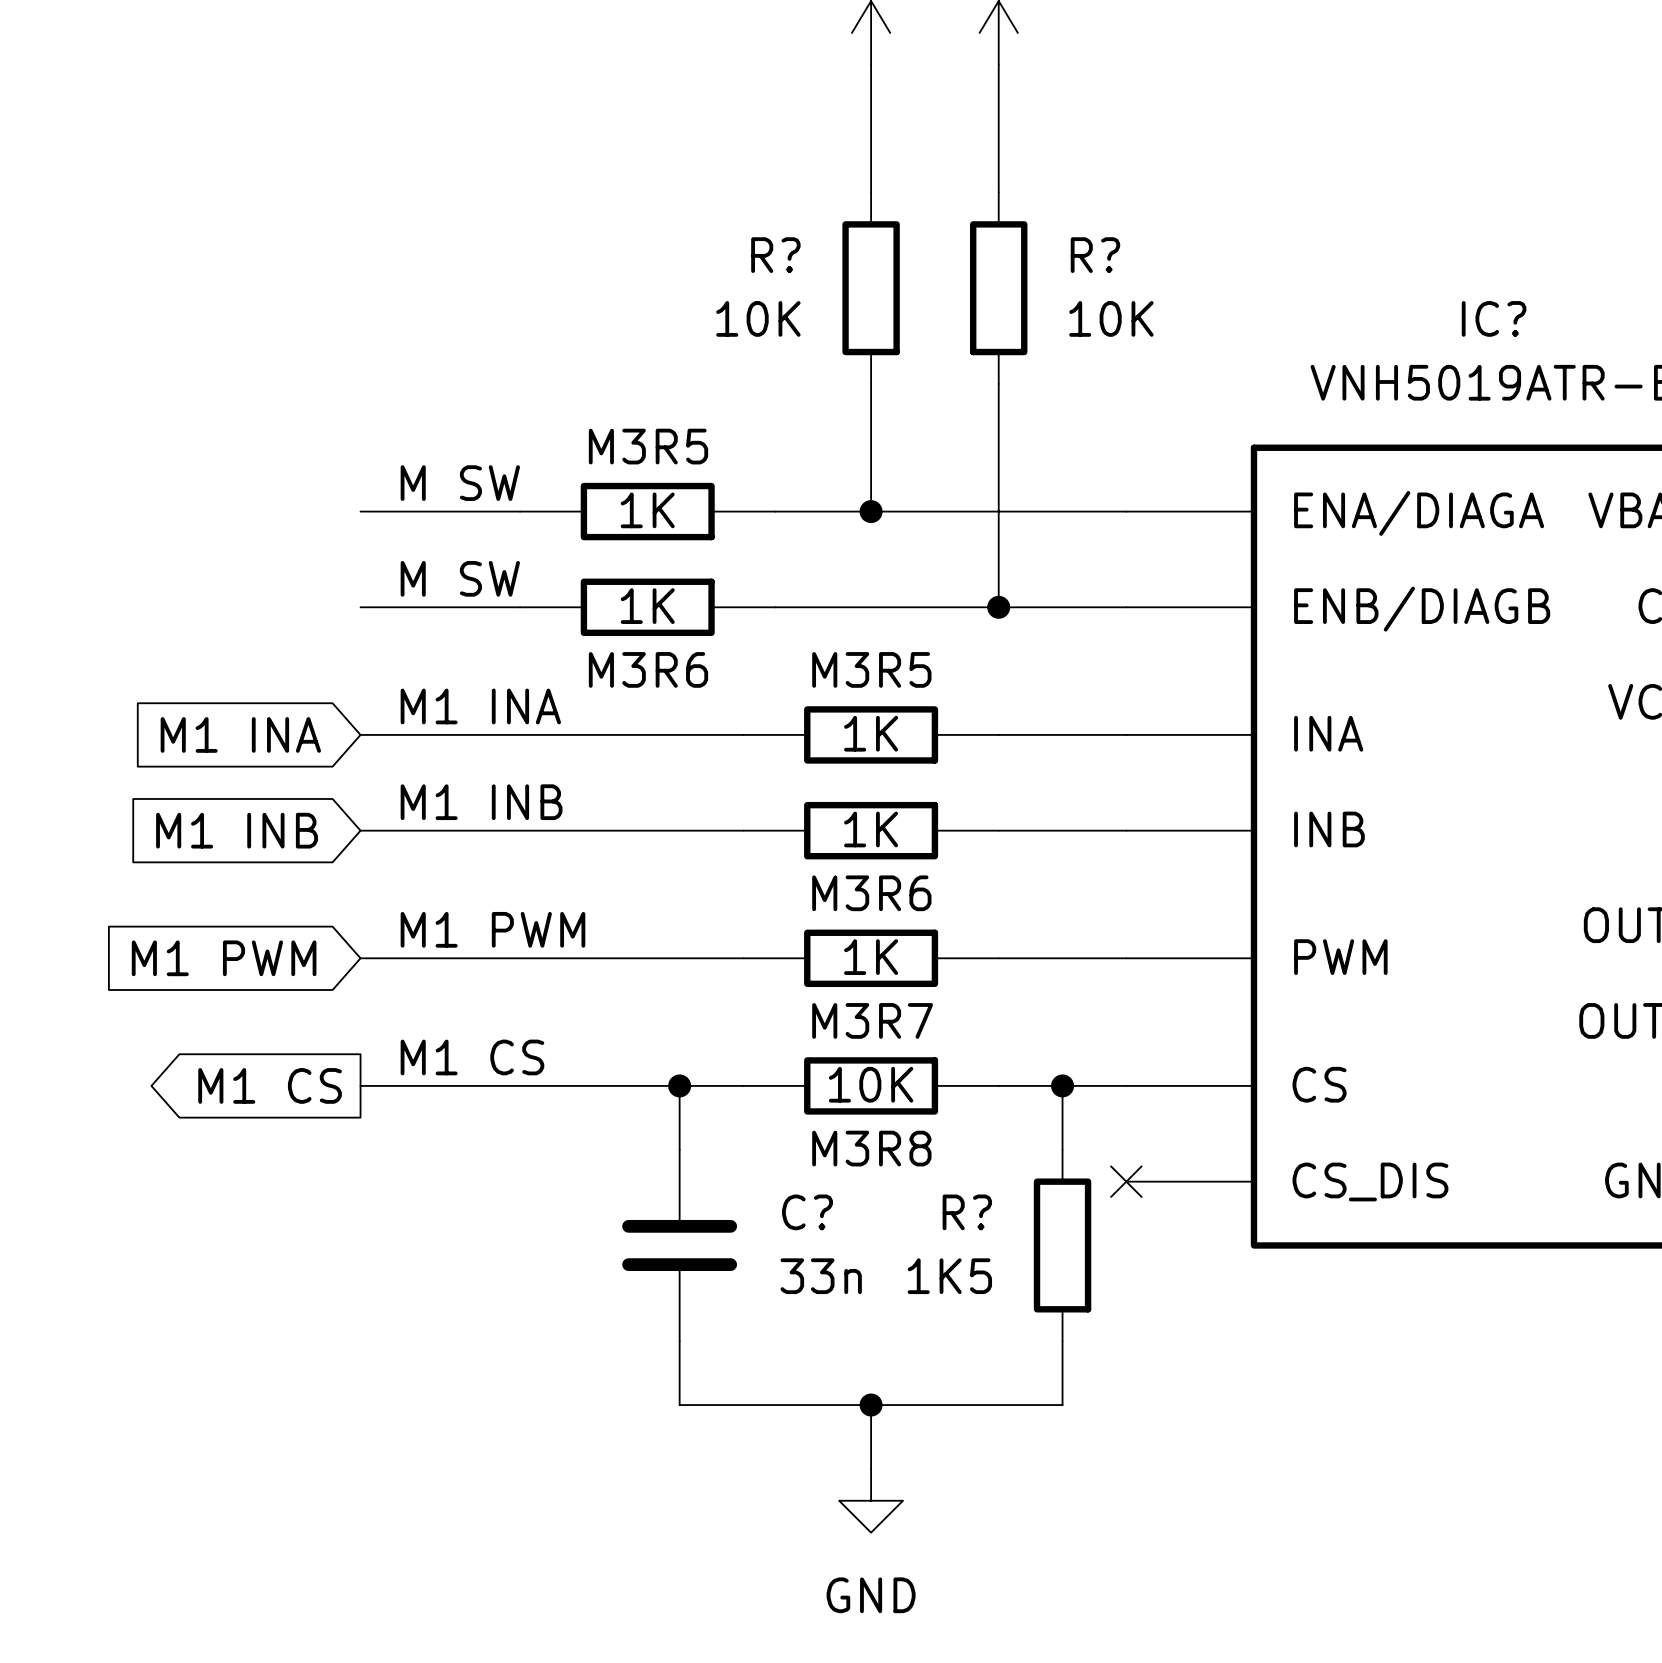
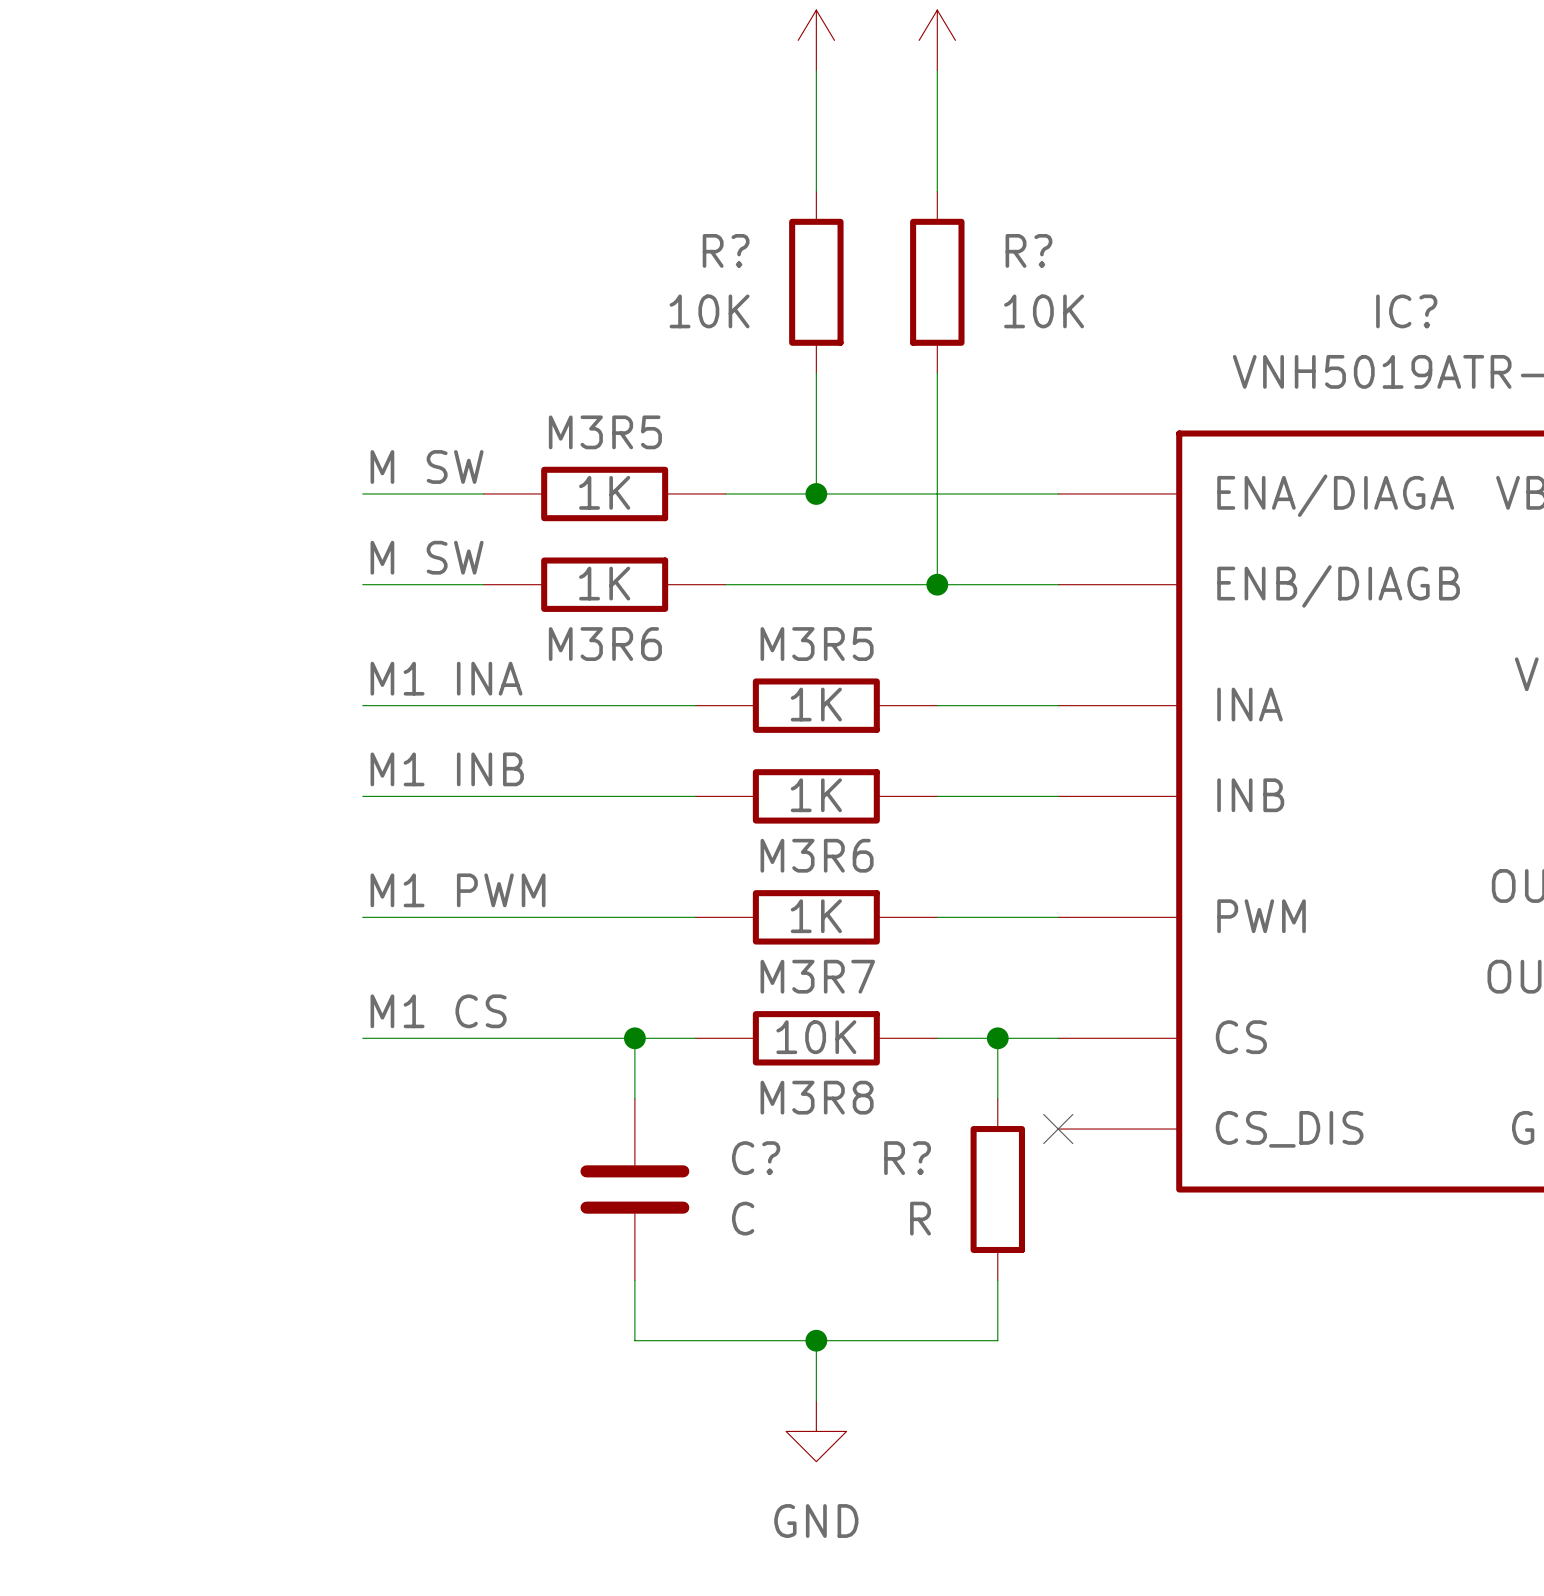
wire: (360, 511) (392, 511) -> none
wire: (360, 607) (392, 607) -> none
global label: M1 INA (240, 734) -> none
wire: (360, 734) (392, 734) -> none
global label: M1 INB (237, 830) -> none
wire: (360, 830) (392, 830) -> none
global label: M1 PWM (224, 958) -> none
wire: (360, 958) (392, 958) -> none
global label: M1 CS (270, 1085) -> none
wire: (360, 1085) (392, 1085) -> none
C? value: 33n (821, 1276) -> C (743, 1218)
R? value: 1K5 (949, 1276) -> R (920, 1218)

